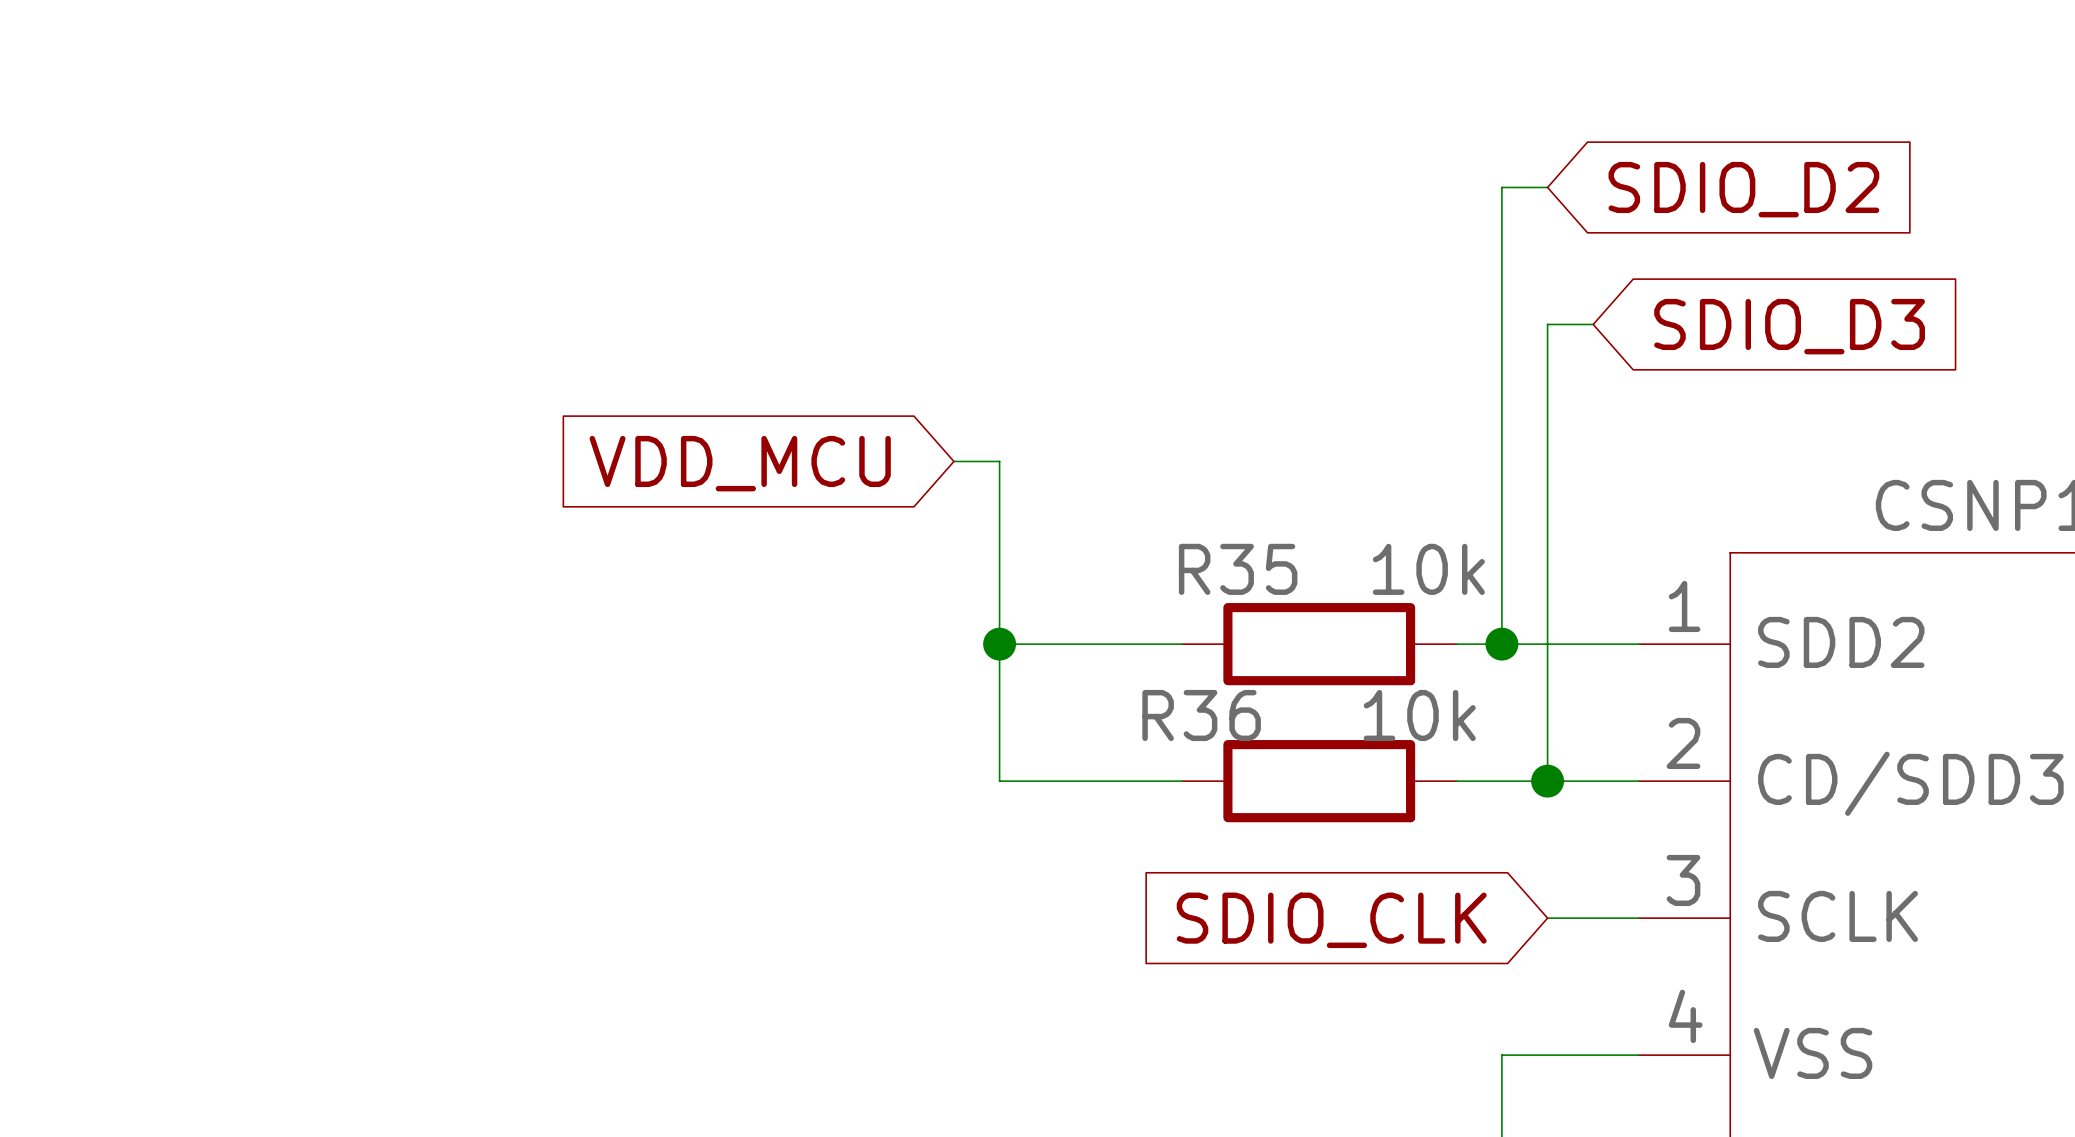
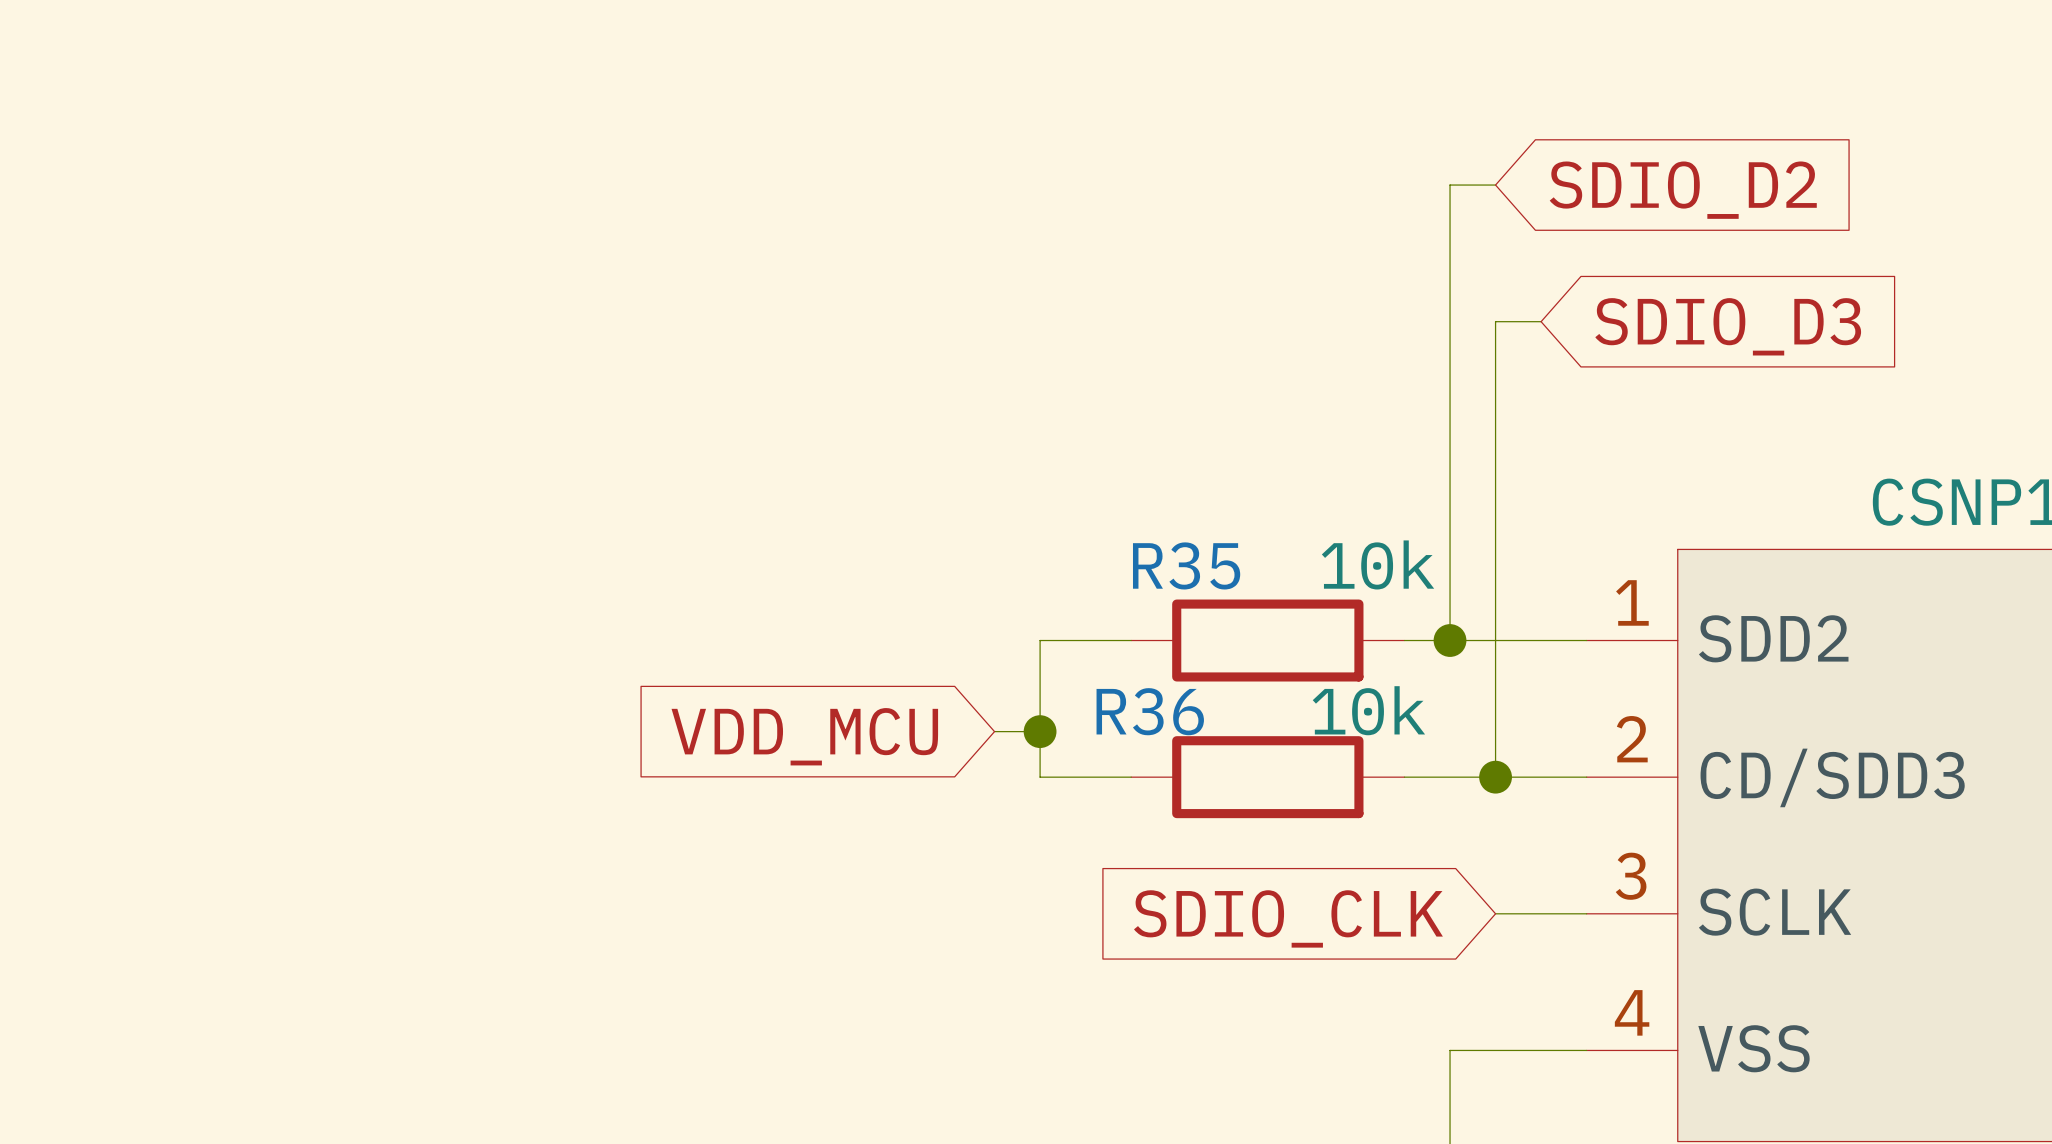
wire: (953, 461) (999, 461) (999, 781) (1090, 781) -> none
global label position: VDD_MCU (740, 463) -> VDD_MCU (804, 736)
wire: (999, 644) (1090, 644) -> (1040, 777) (1040, 640)
junction position: (999, 644) -> (1040, 731)
wire: none -> (994, 731) (1040, 731)

